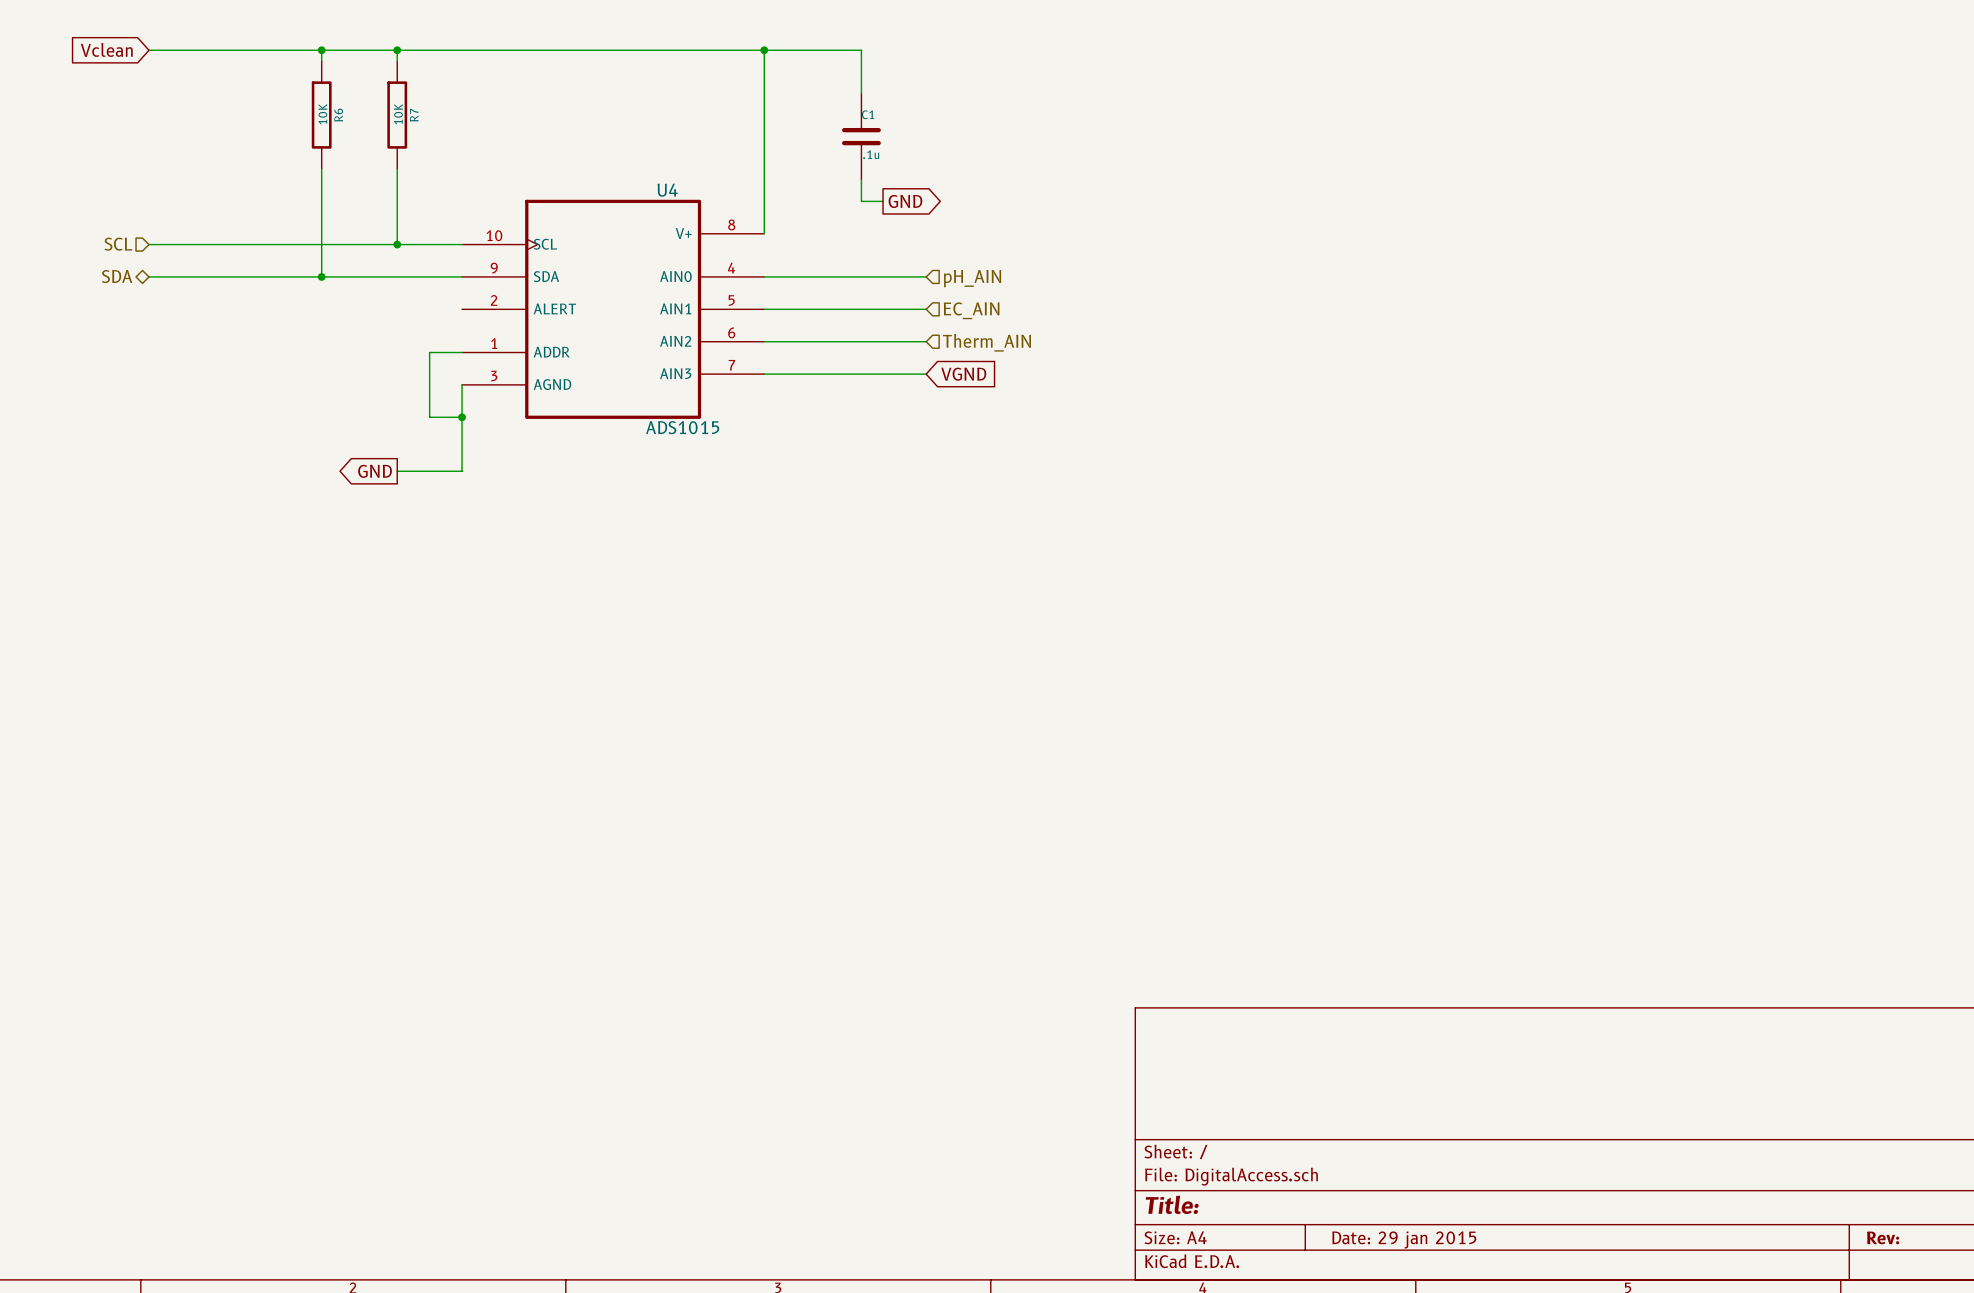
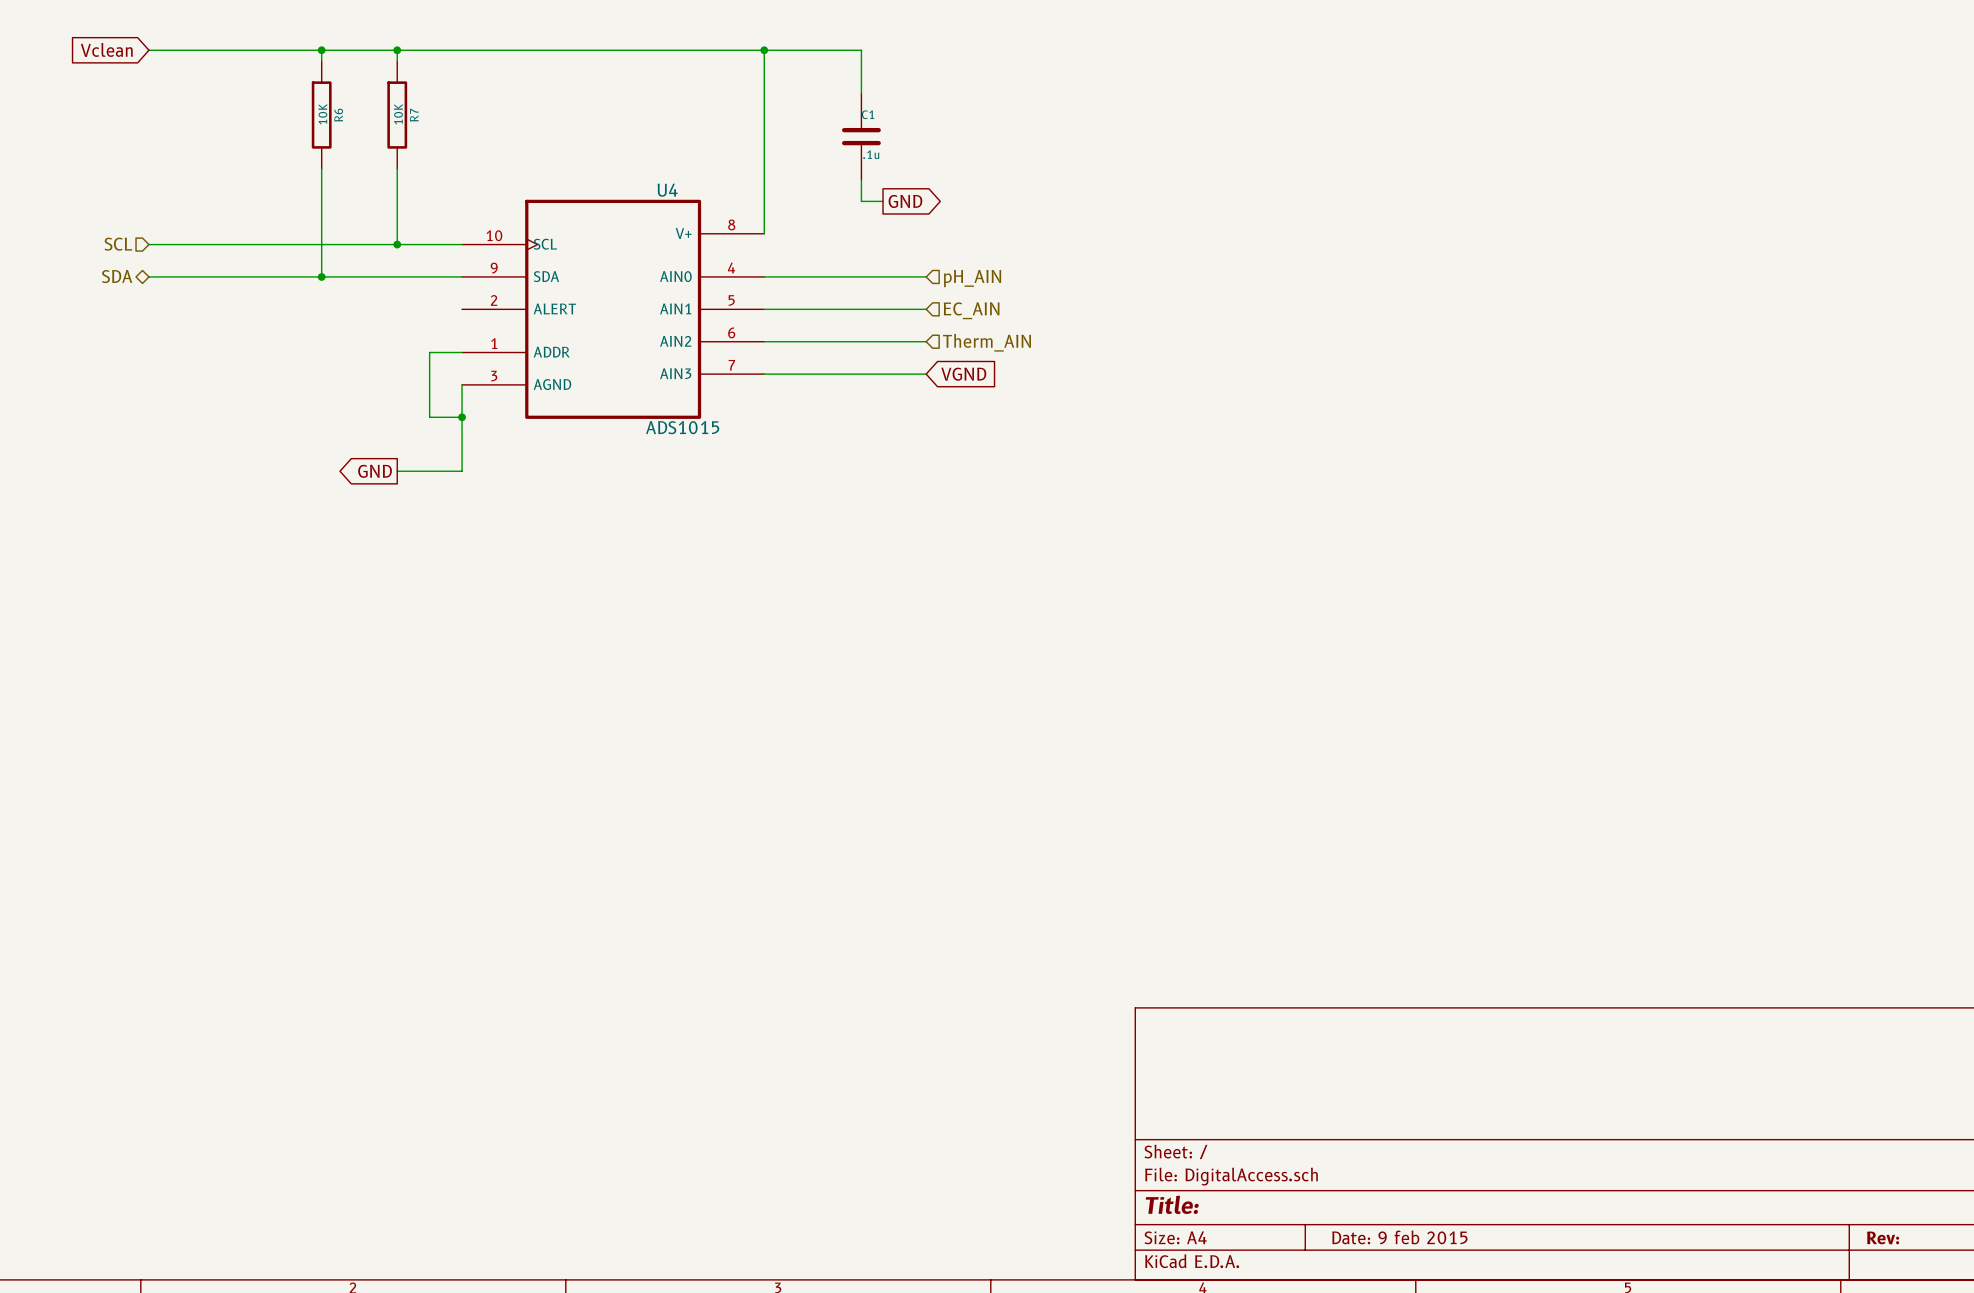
title block: Date: 29 jan 2015 (1404, 1239) -> Date: 9 feb 2015 (1399, 1237)

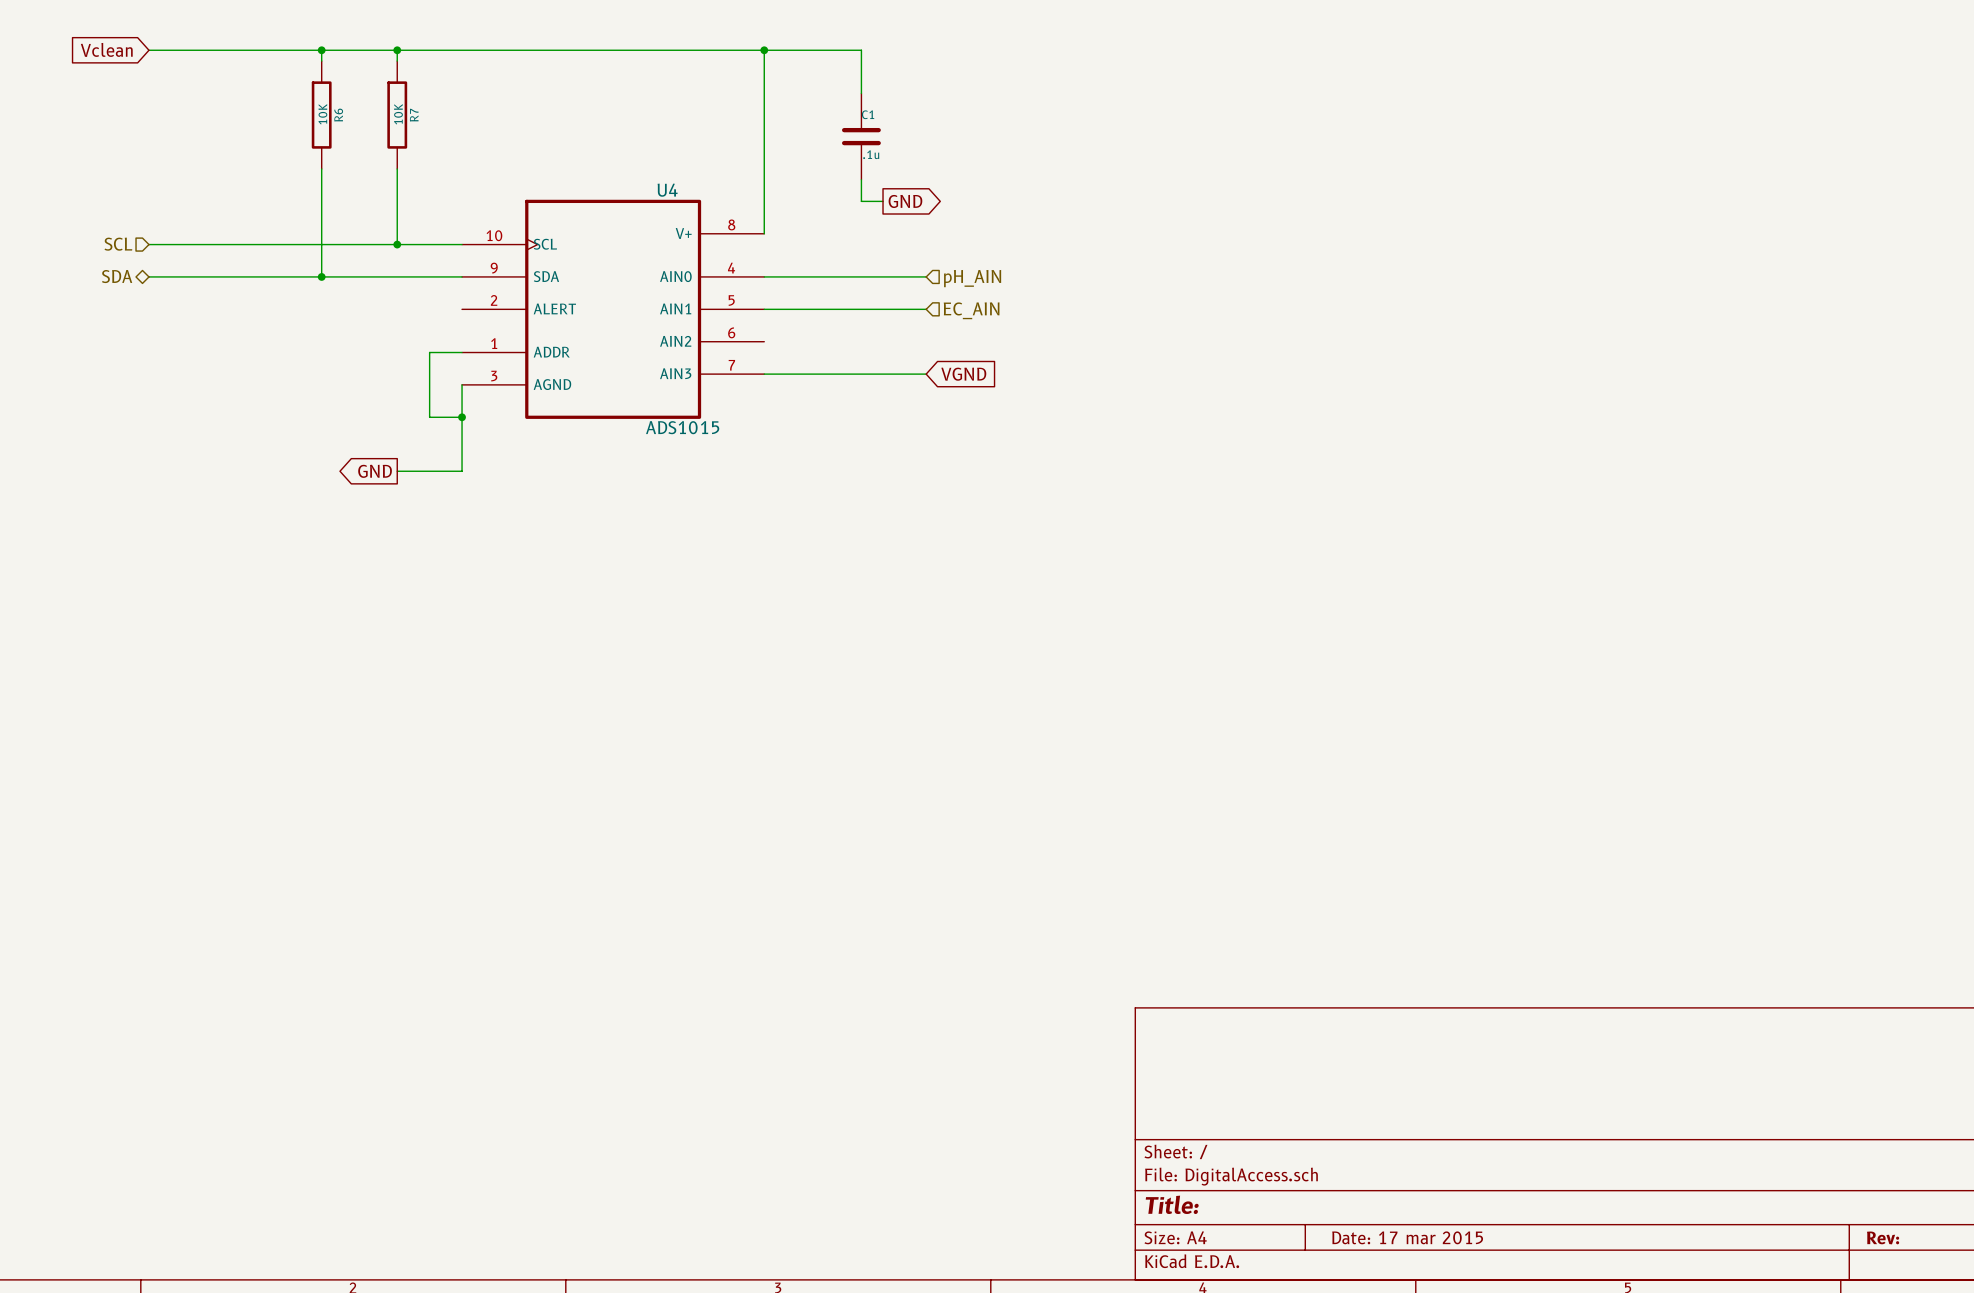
wire: (764, 341) (926, 341) -> none
hierarchical label: Therm_AIN (987, 342) -> none
title block: Date: 9 feb 2015 (1399, 1237) -> Date: 17 mar 2015 (1407, 1237)

